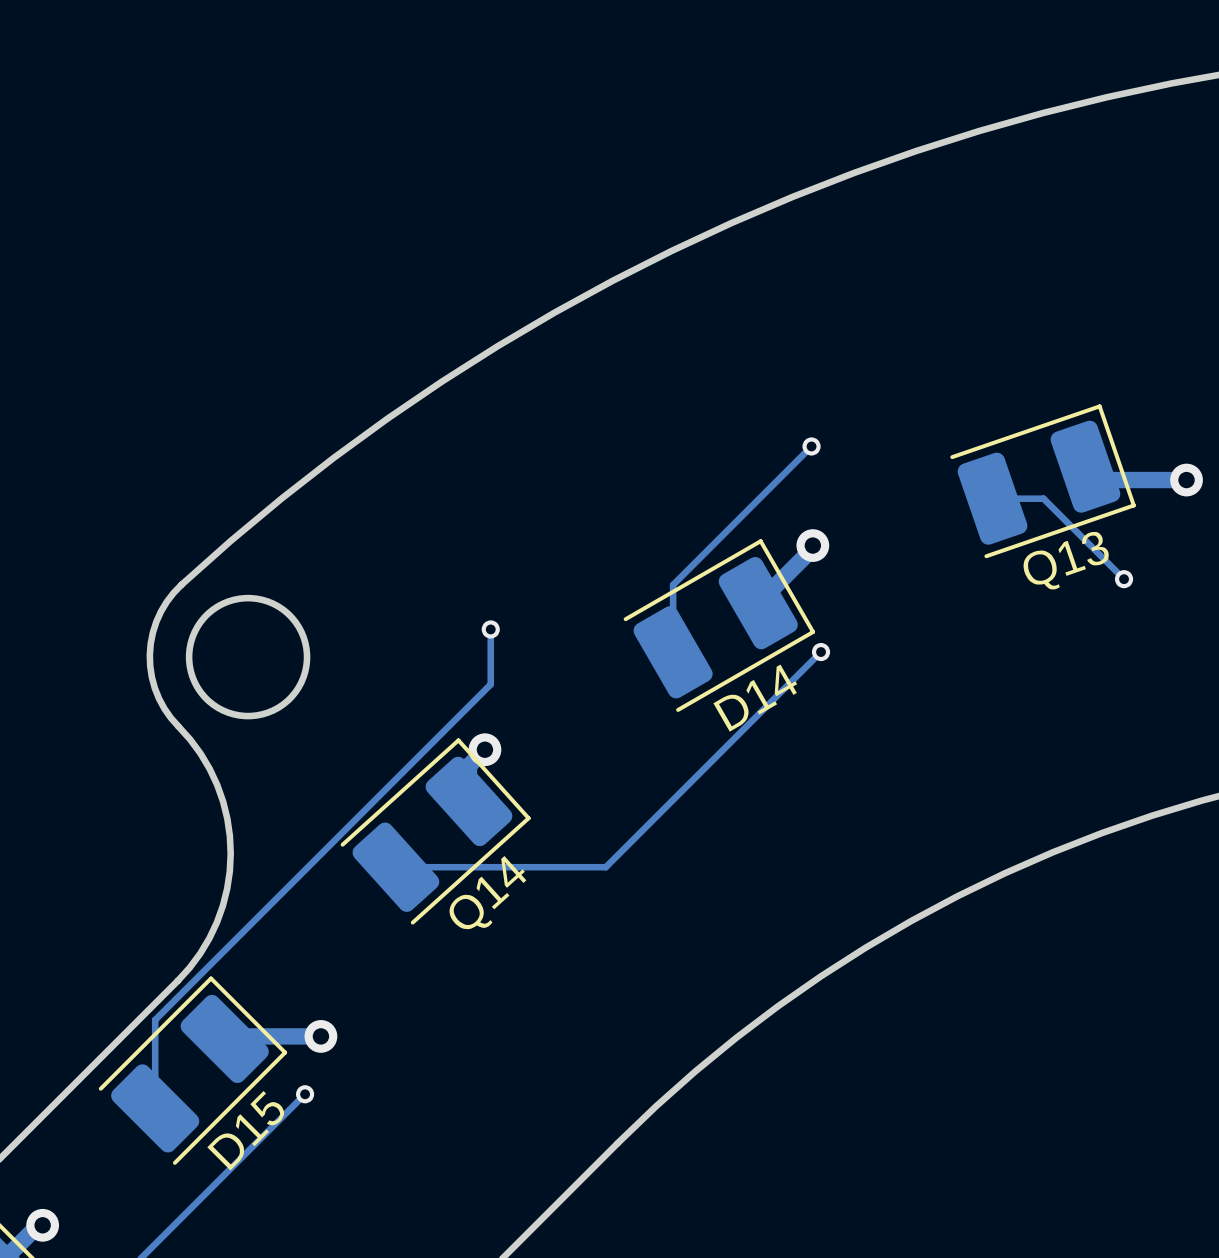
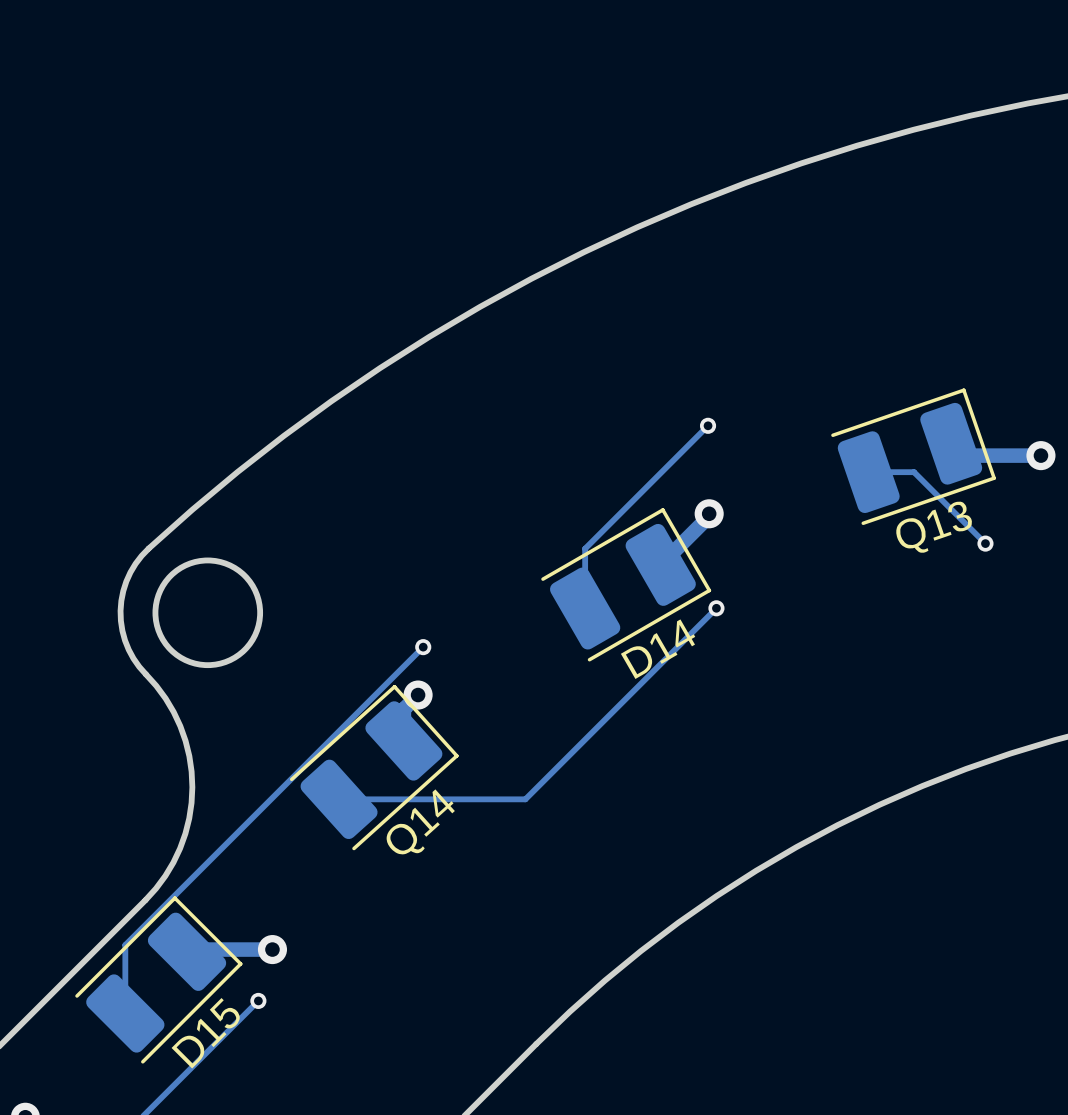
track: (490, 629) (490, 684) (155, 1019) (155, 1108) -> (423, 647) (125, 945) (125, 1013)
via position: (490, 629) -> (423, 647)

